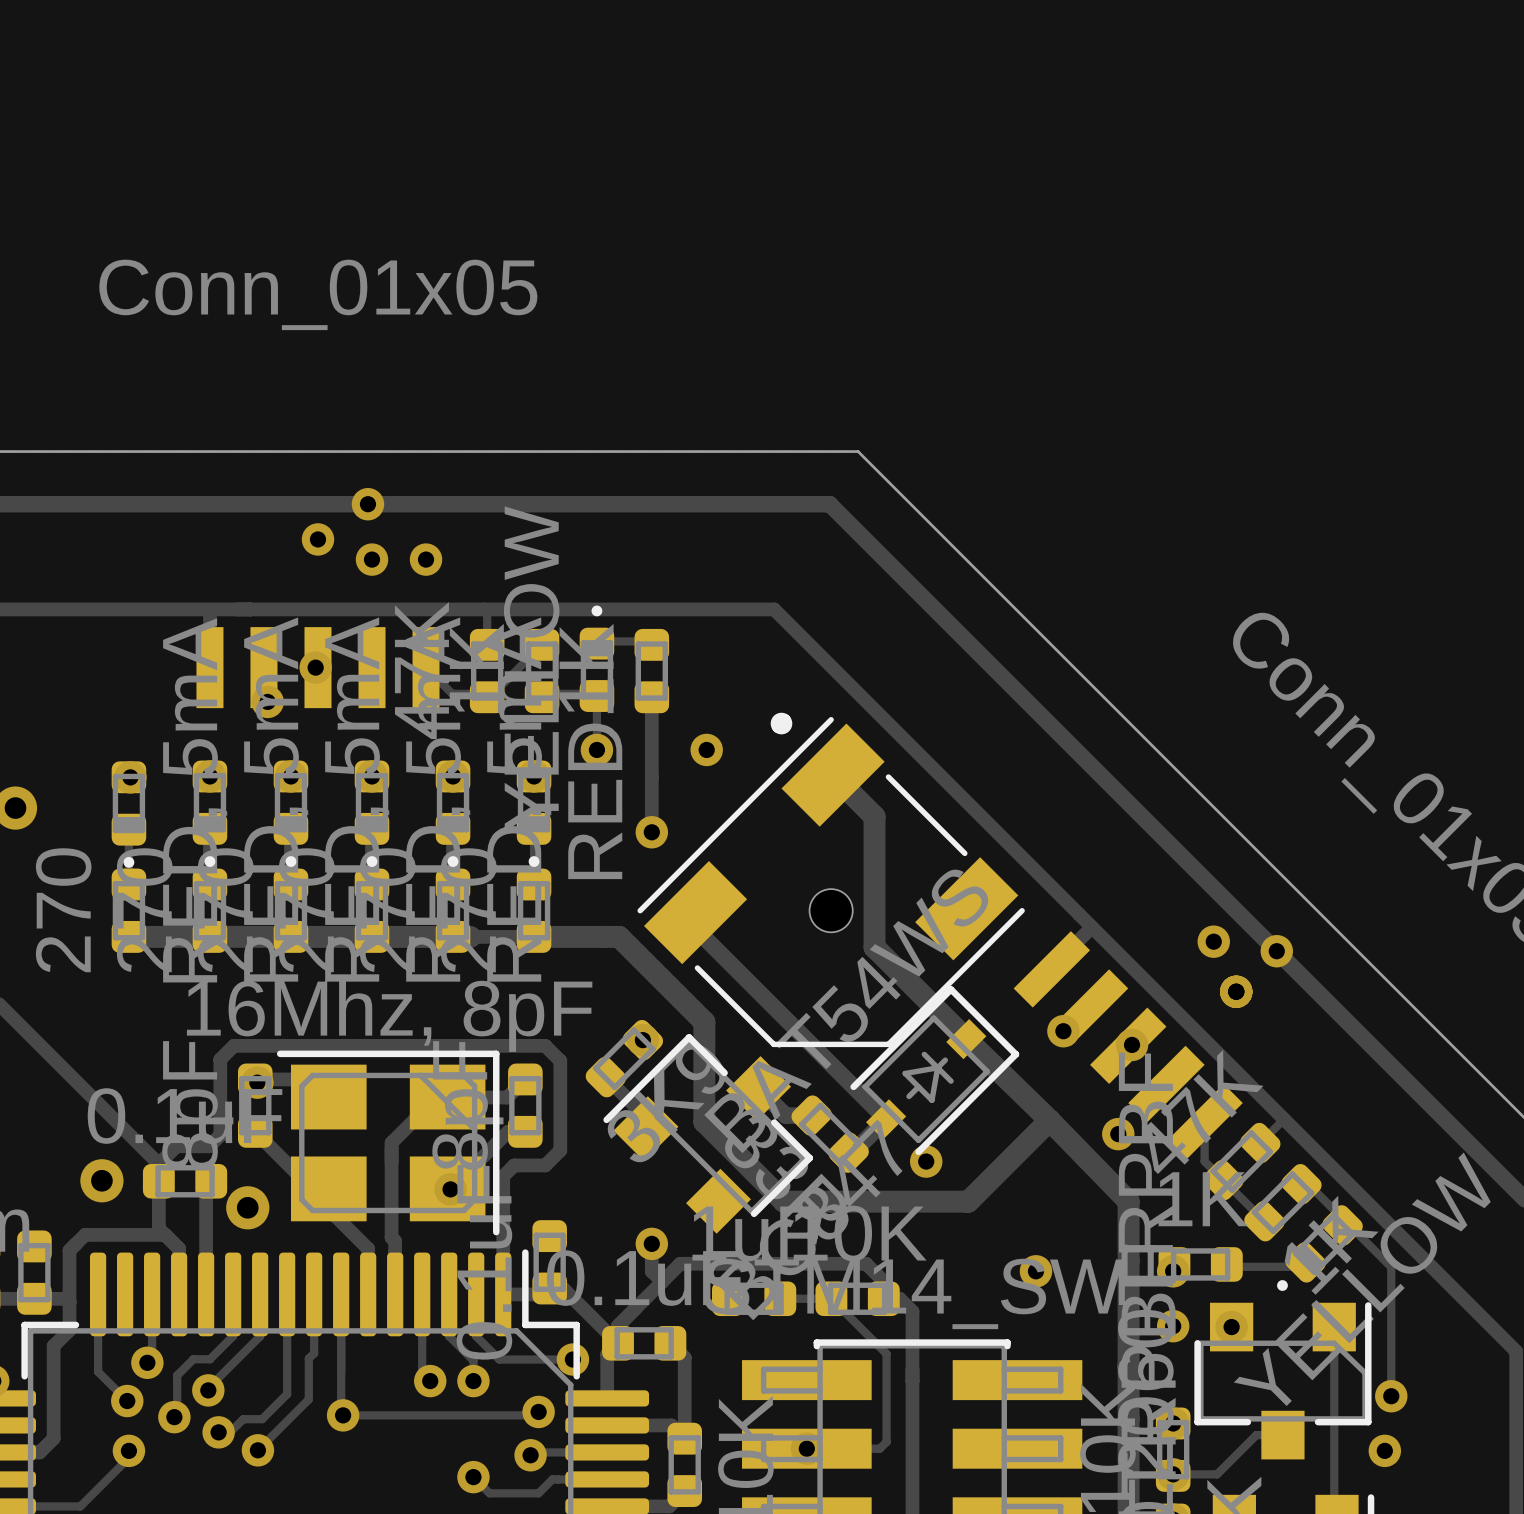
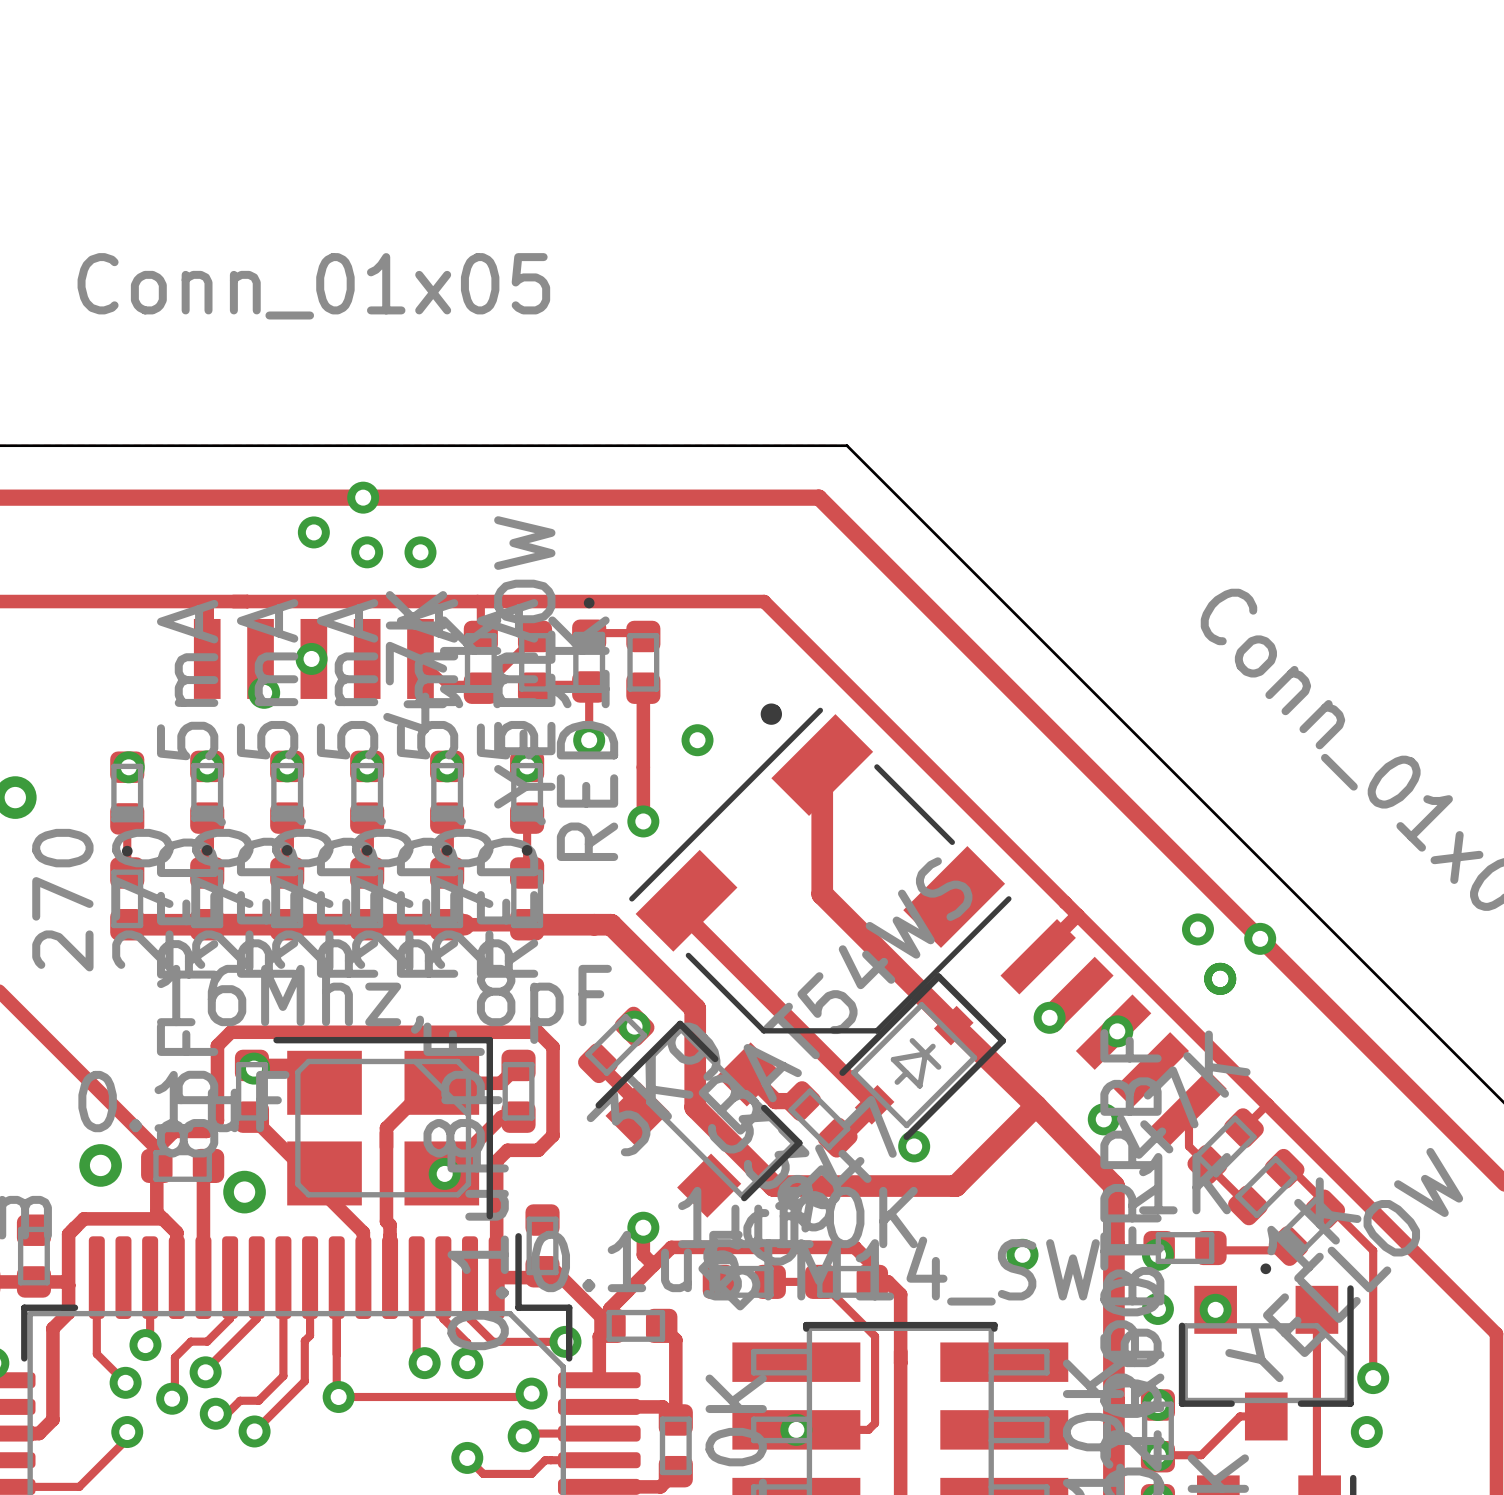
part footprint: [637, 712, 1025, 1048] -> [629, 703, 1012, 1034]
track: (833, 775) (874, 816) (874, 947) -> (822, 765) (822, 894) (863, 935)

